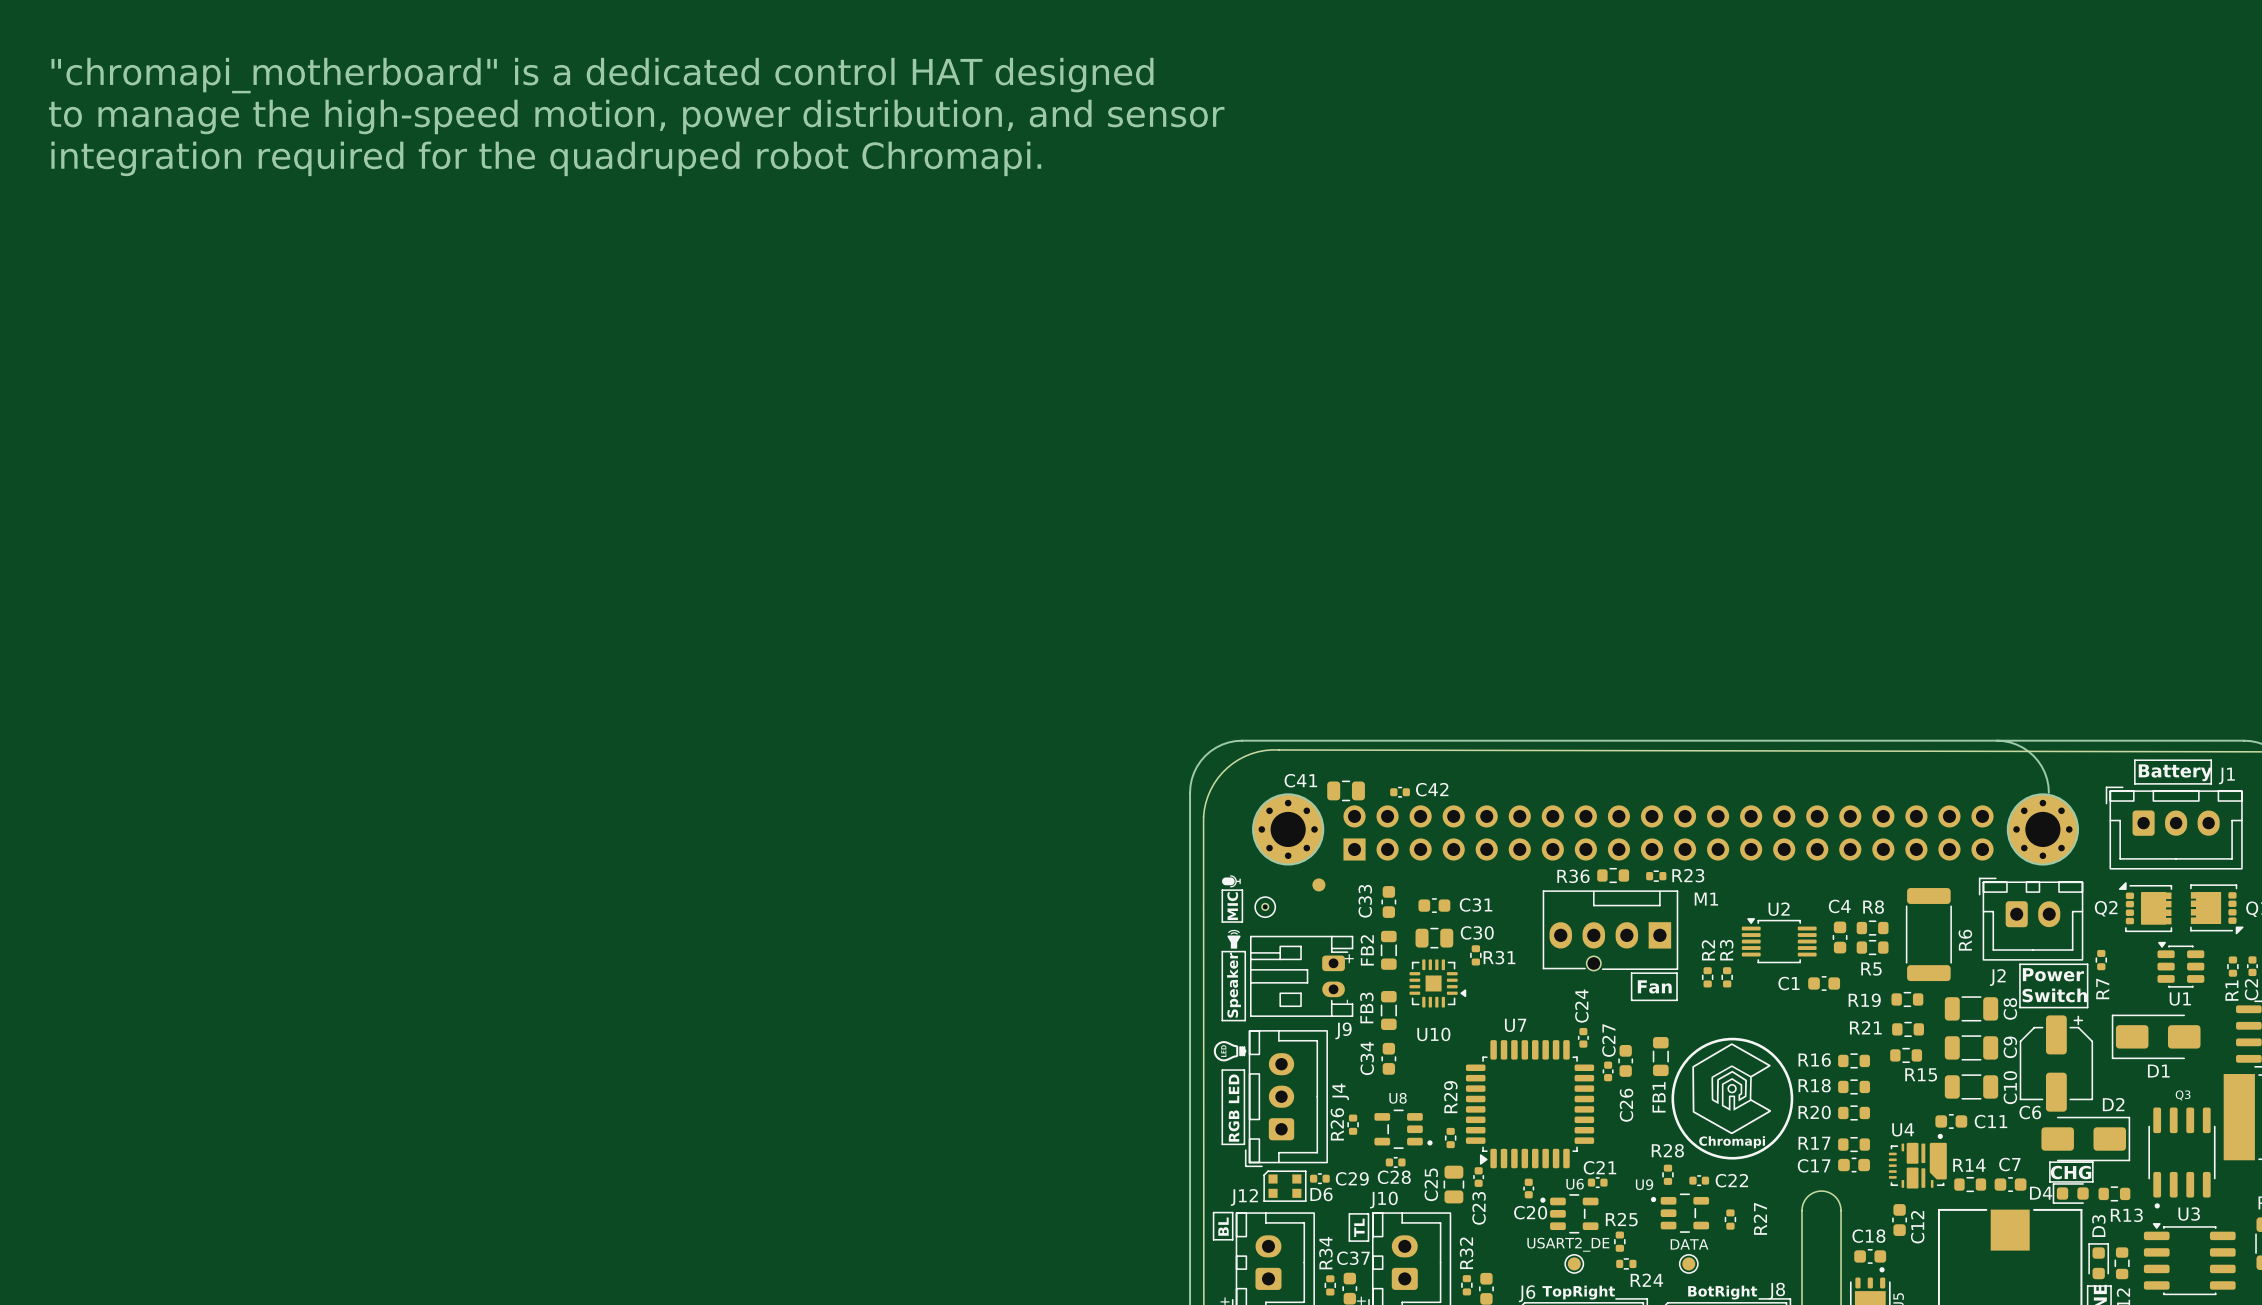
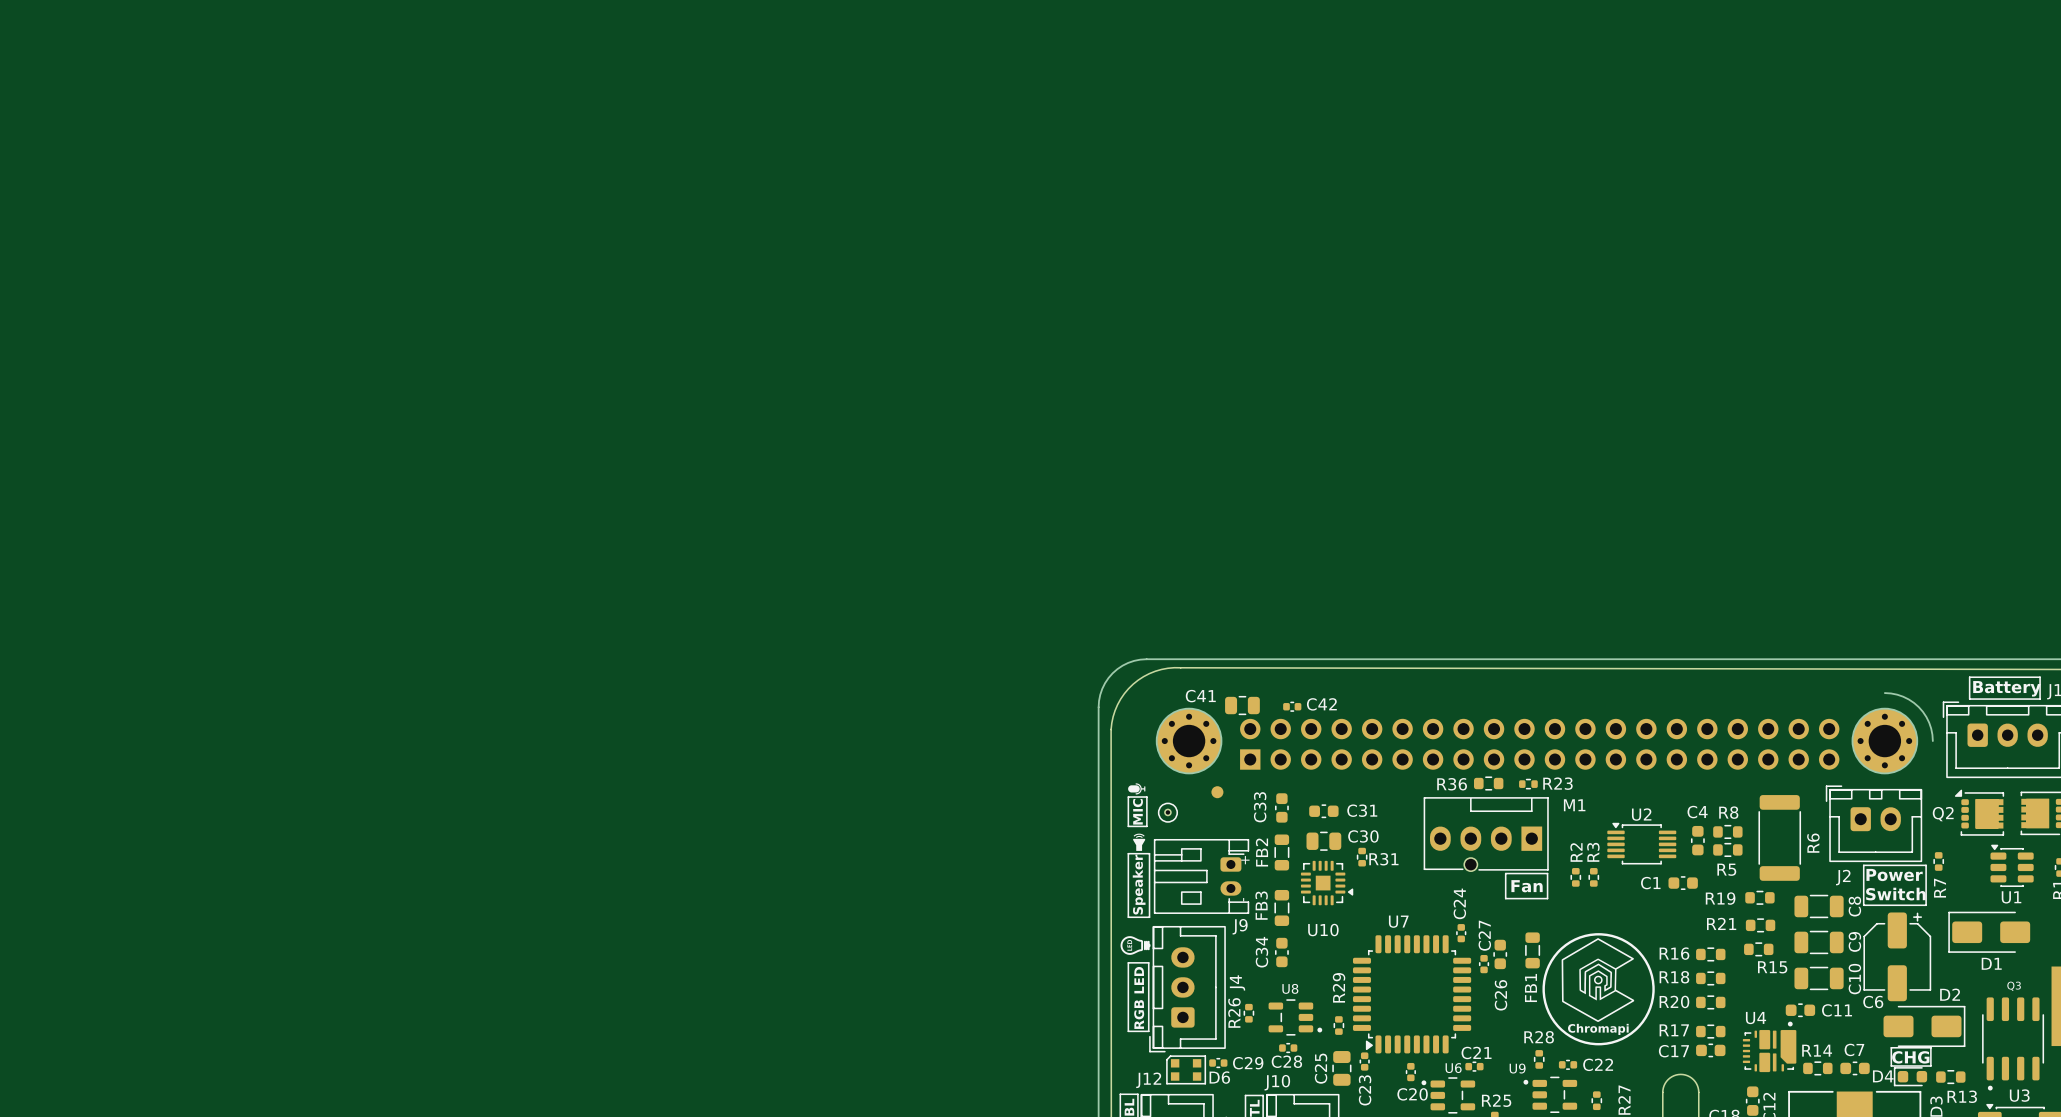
text: "chromapi_motherboard" is a dedicated control HAT designed (602, 75) -> none
text: to manage the high-speed motion, power distribution, and sensor (636, 116) -> none
text: integration required for the quadruped robot Chromapi. (546, 158) -> none
line: (1996, 740) (2016, 744) (2033, 755) (2044, 772) (2048, 792) -> (1884, 693) (1903, 696) (1918, 707) (1929, 722) (1932, 741)

